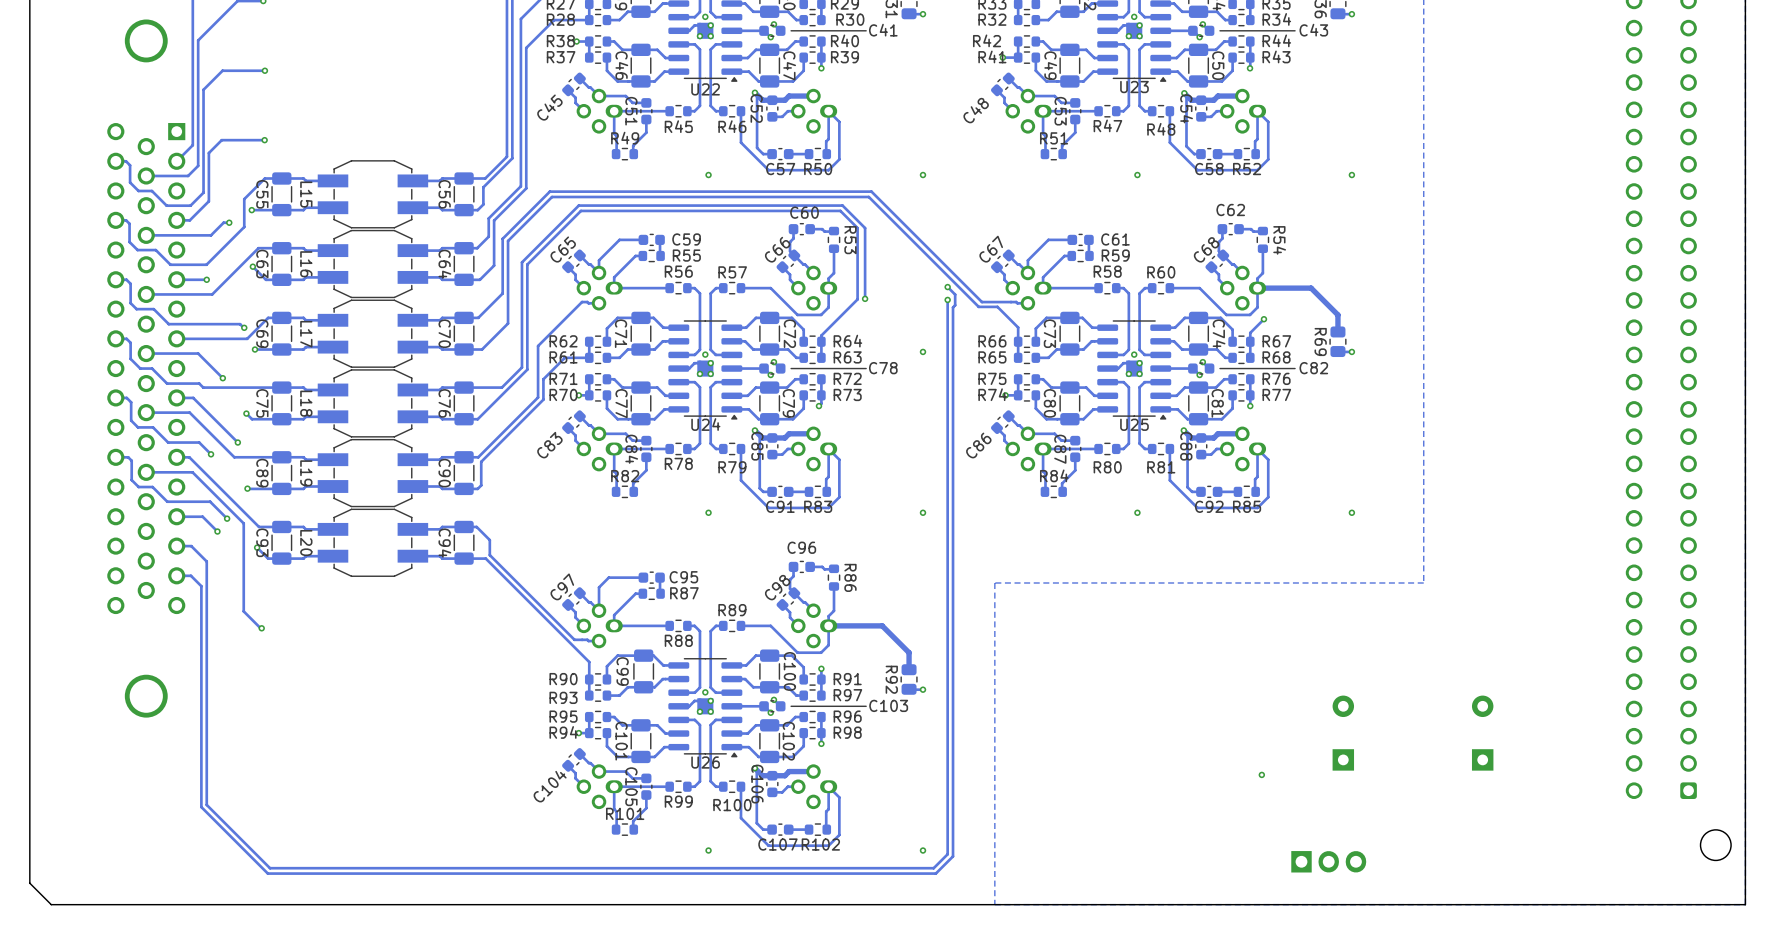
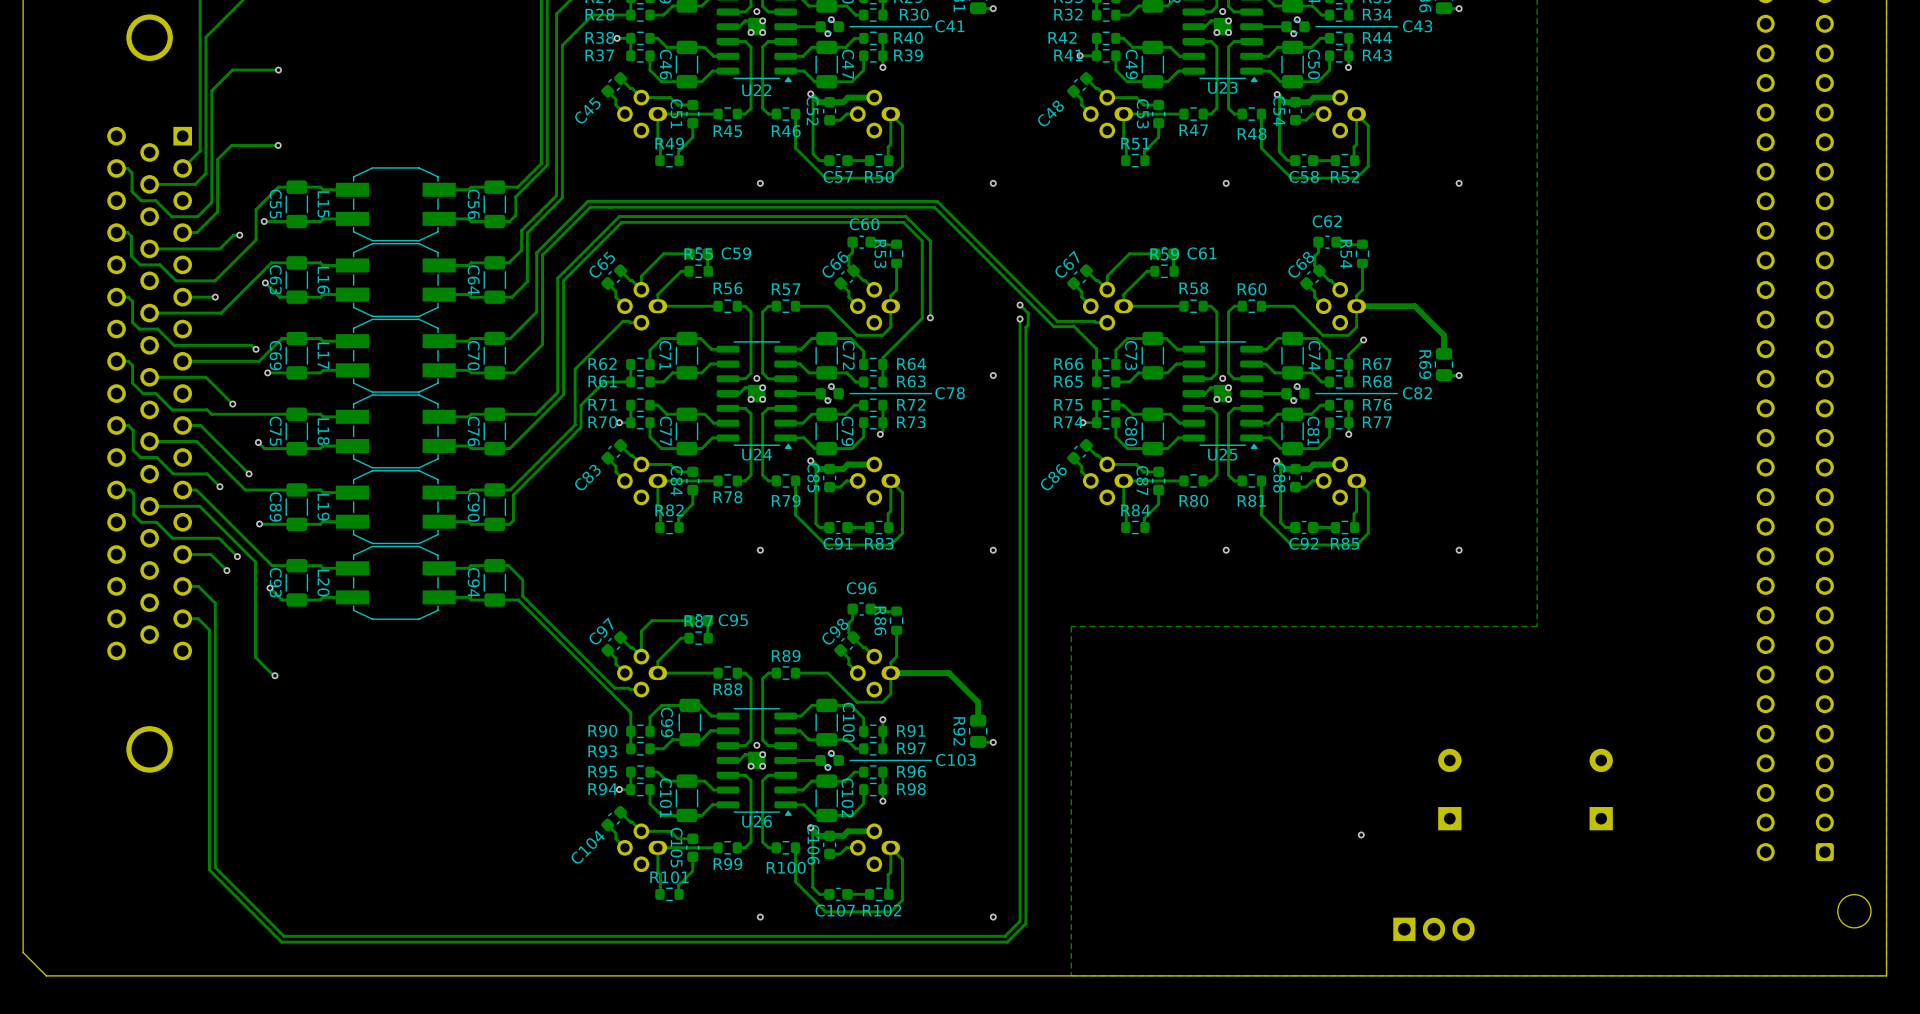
R53 name position: R53 (850, 240) -> R53 (880, 253)
R54 name position: R54 (1279, 240) -> R54 (1346, 254)
R55 name position: R55 (686, 255) -> R55 (698, 254)
R59 name position: R59 (1115, 255) -> R59 (1164, 254)
R86 name position: R86 (850, 577) -> R86 (880, 620)
R87 name position: R87 (684, 593) -> R87 (698, 621)

